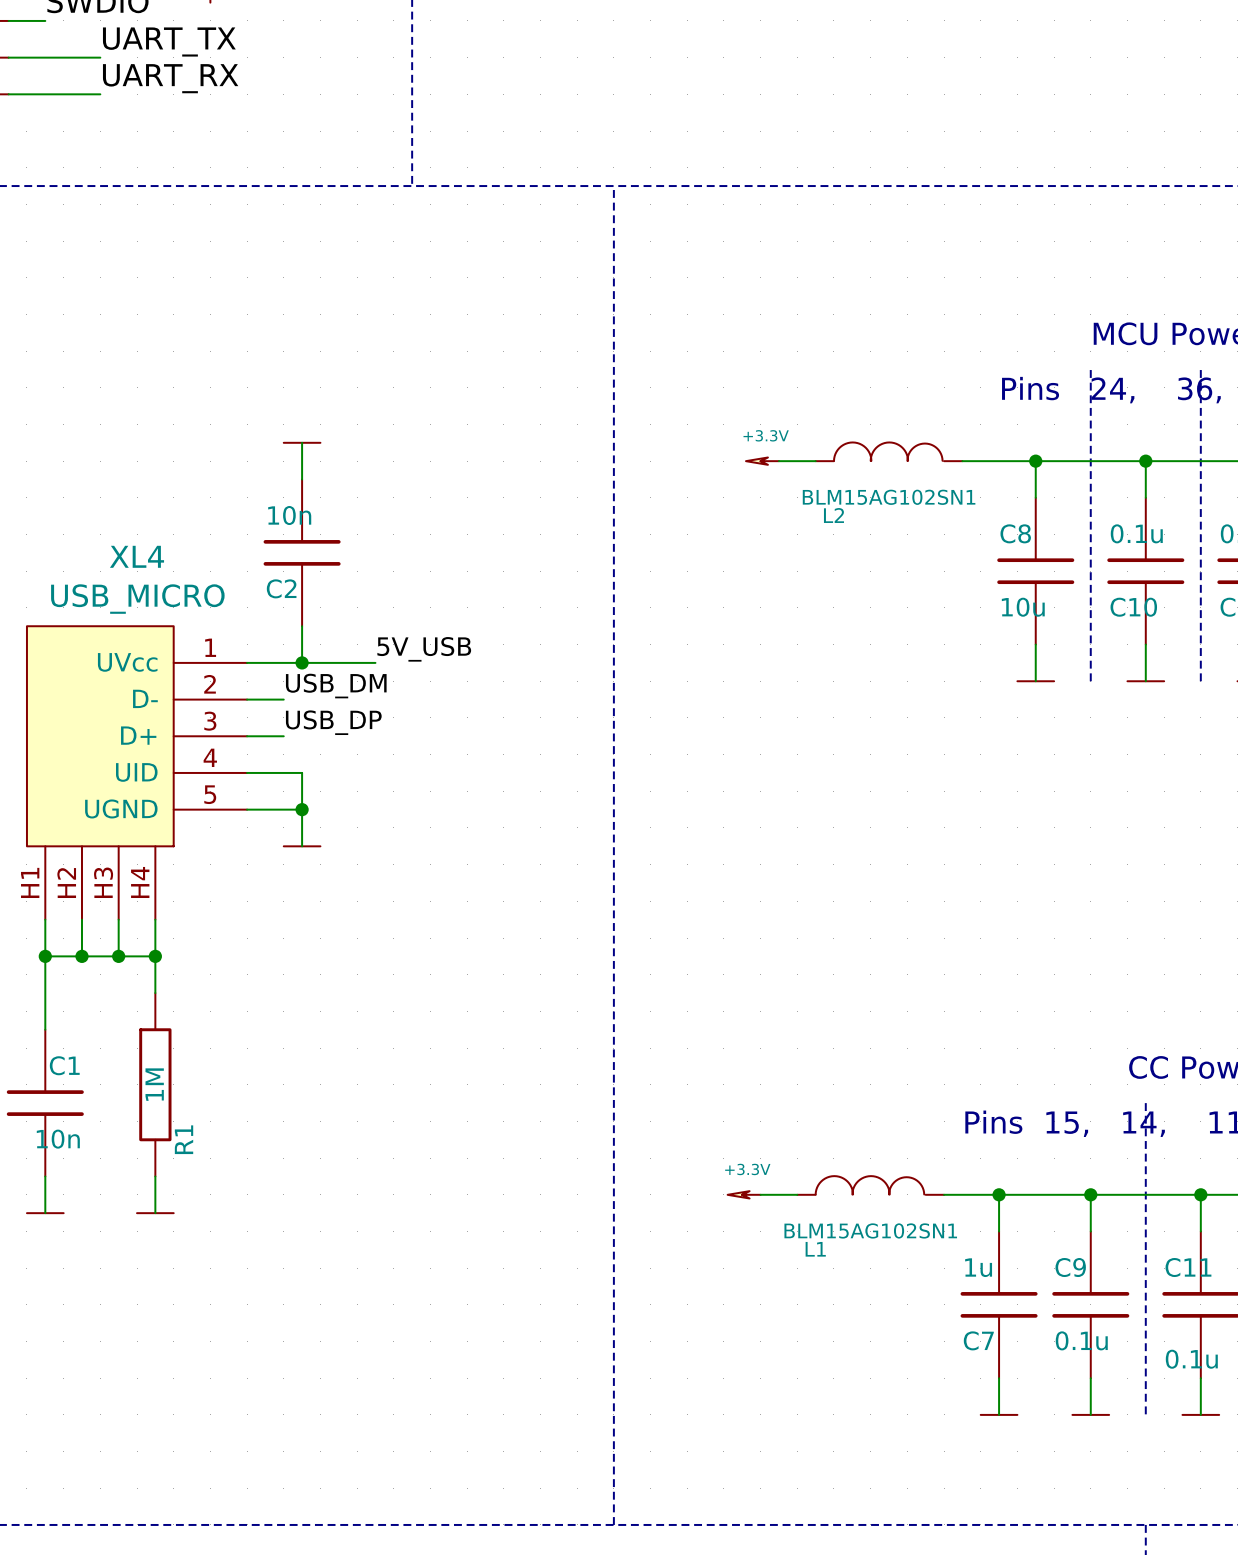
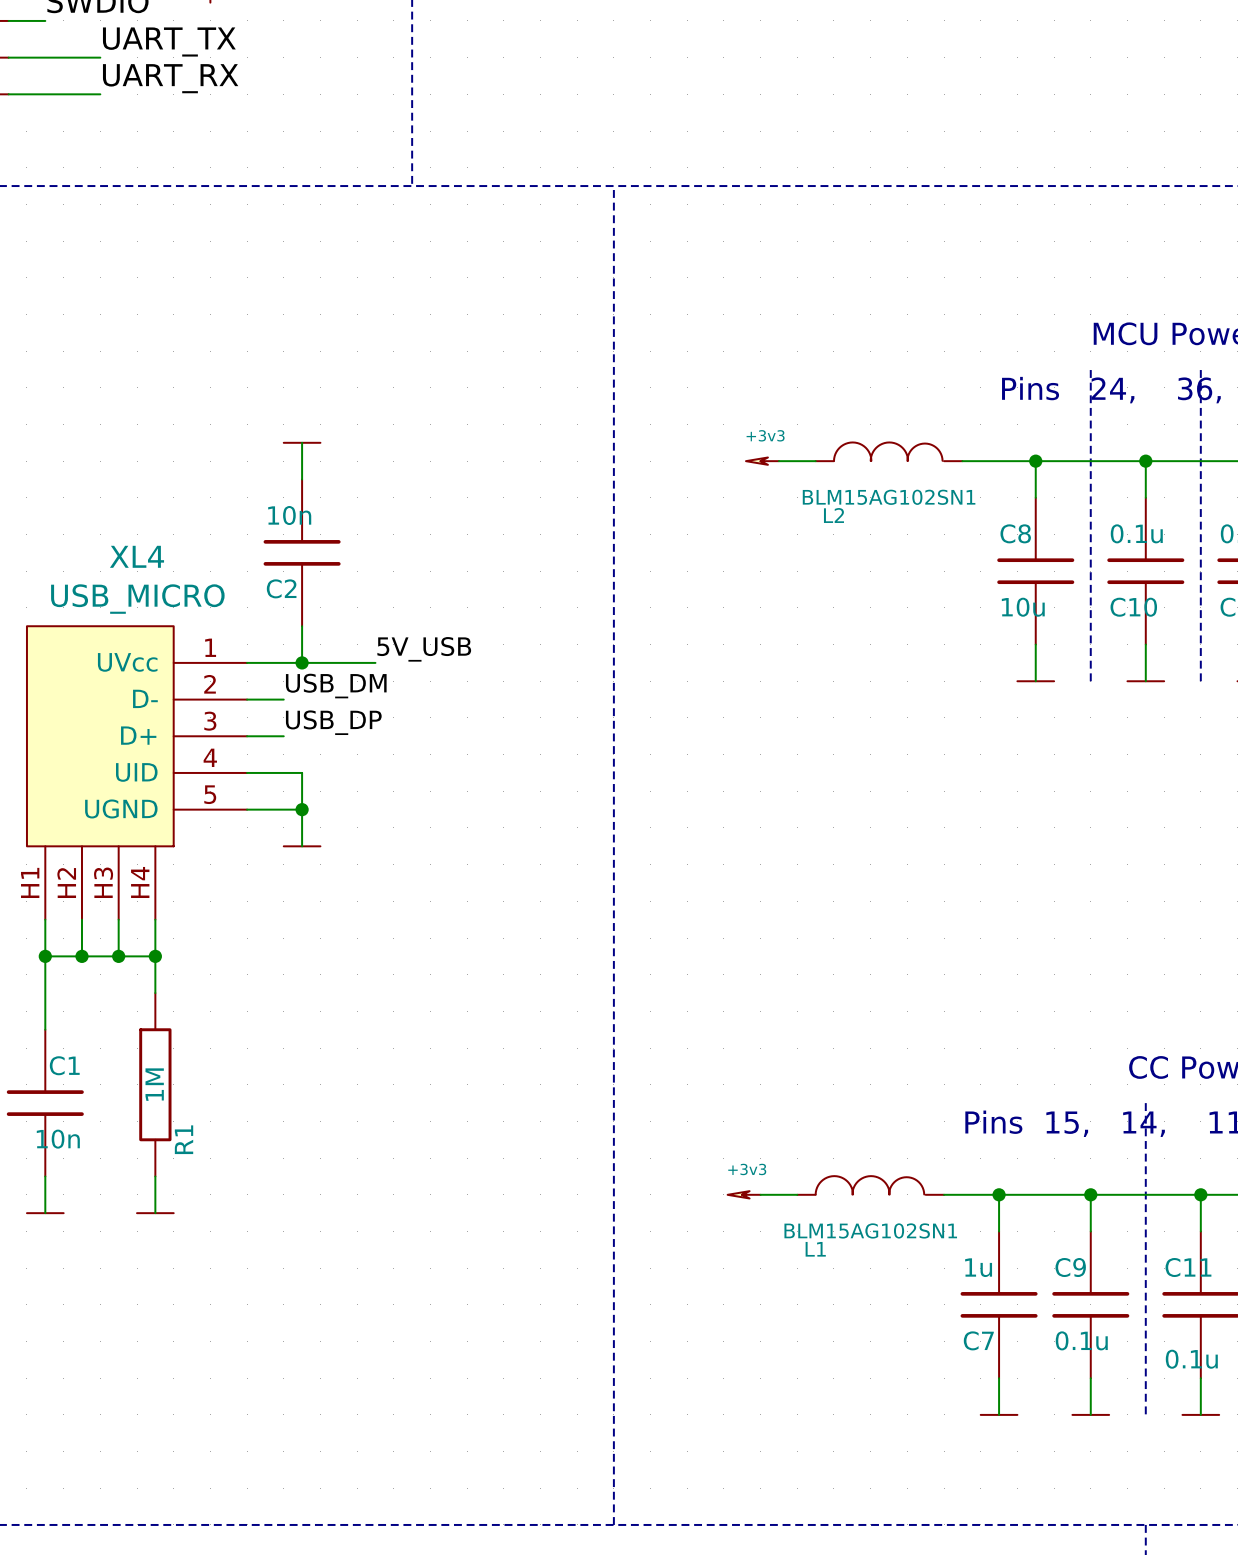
power symbol: +3.3V (762, 461) -> +3v3 (762, 461)
power symbol: +3.3V (744, 1194) -> +3v3 (744, 1194)

